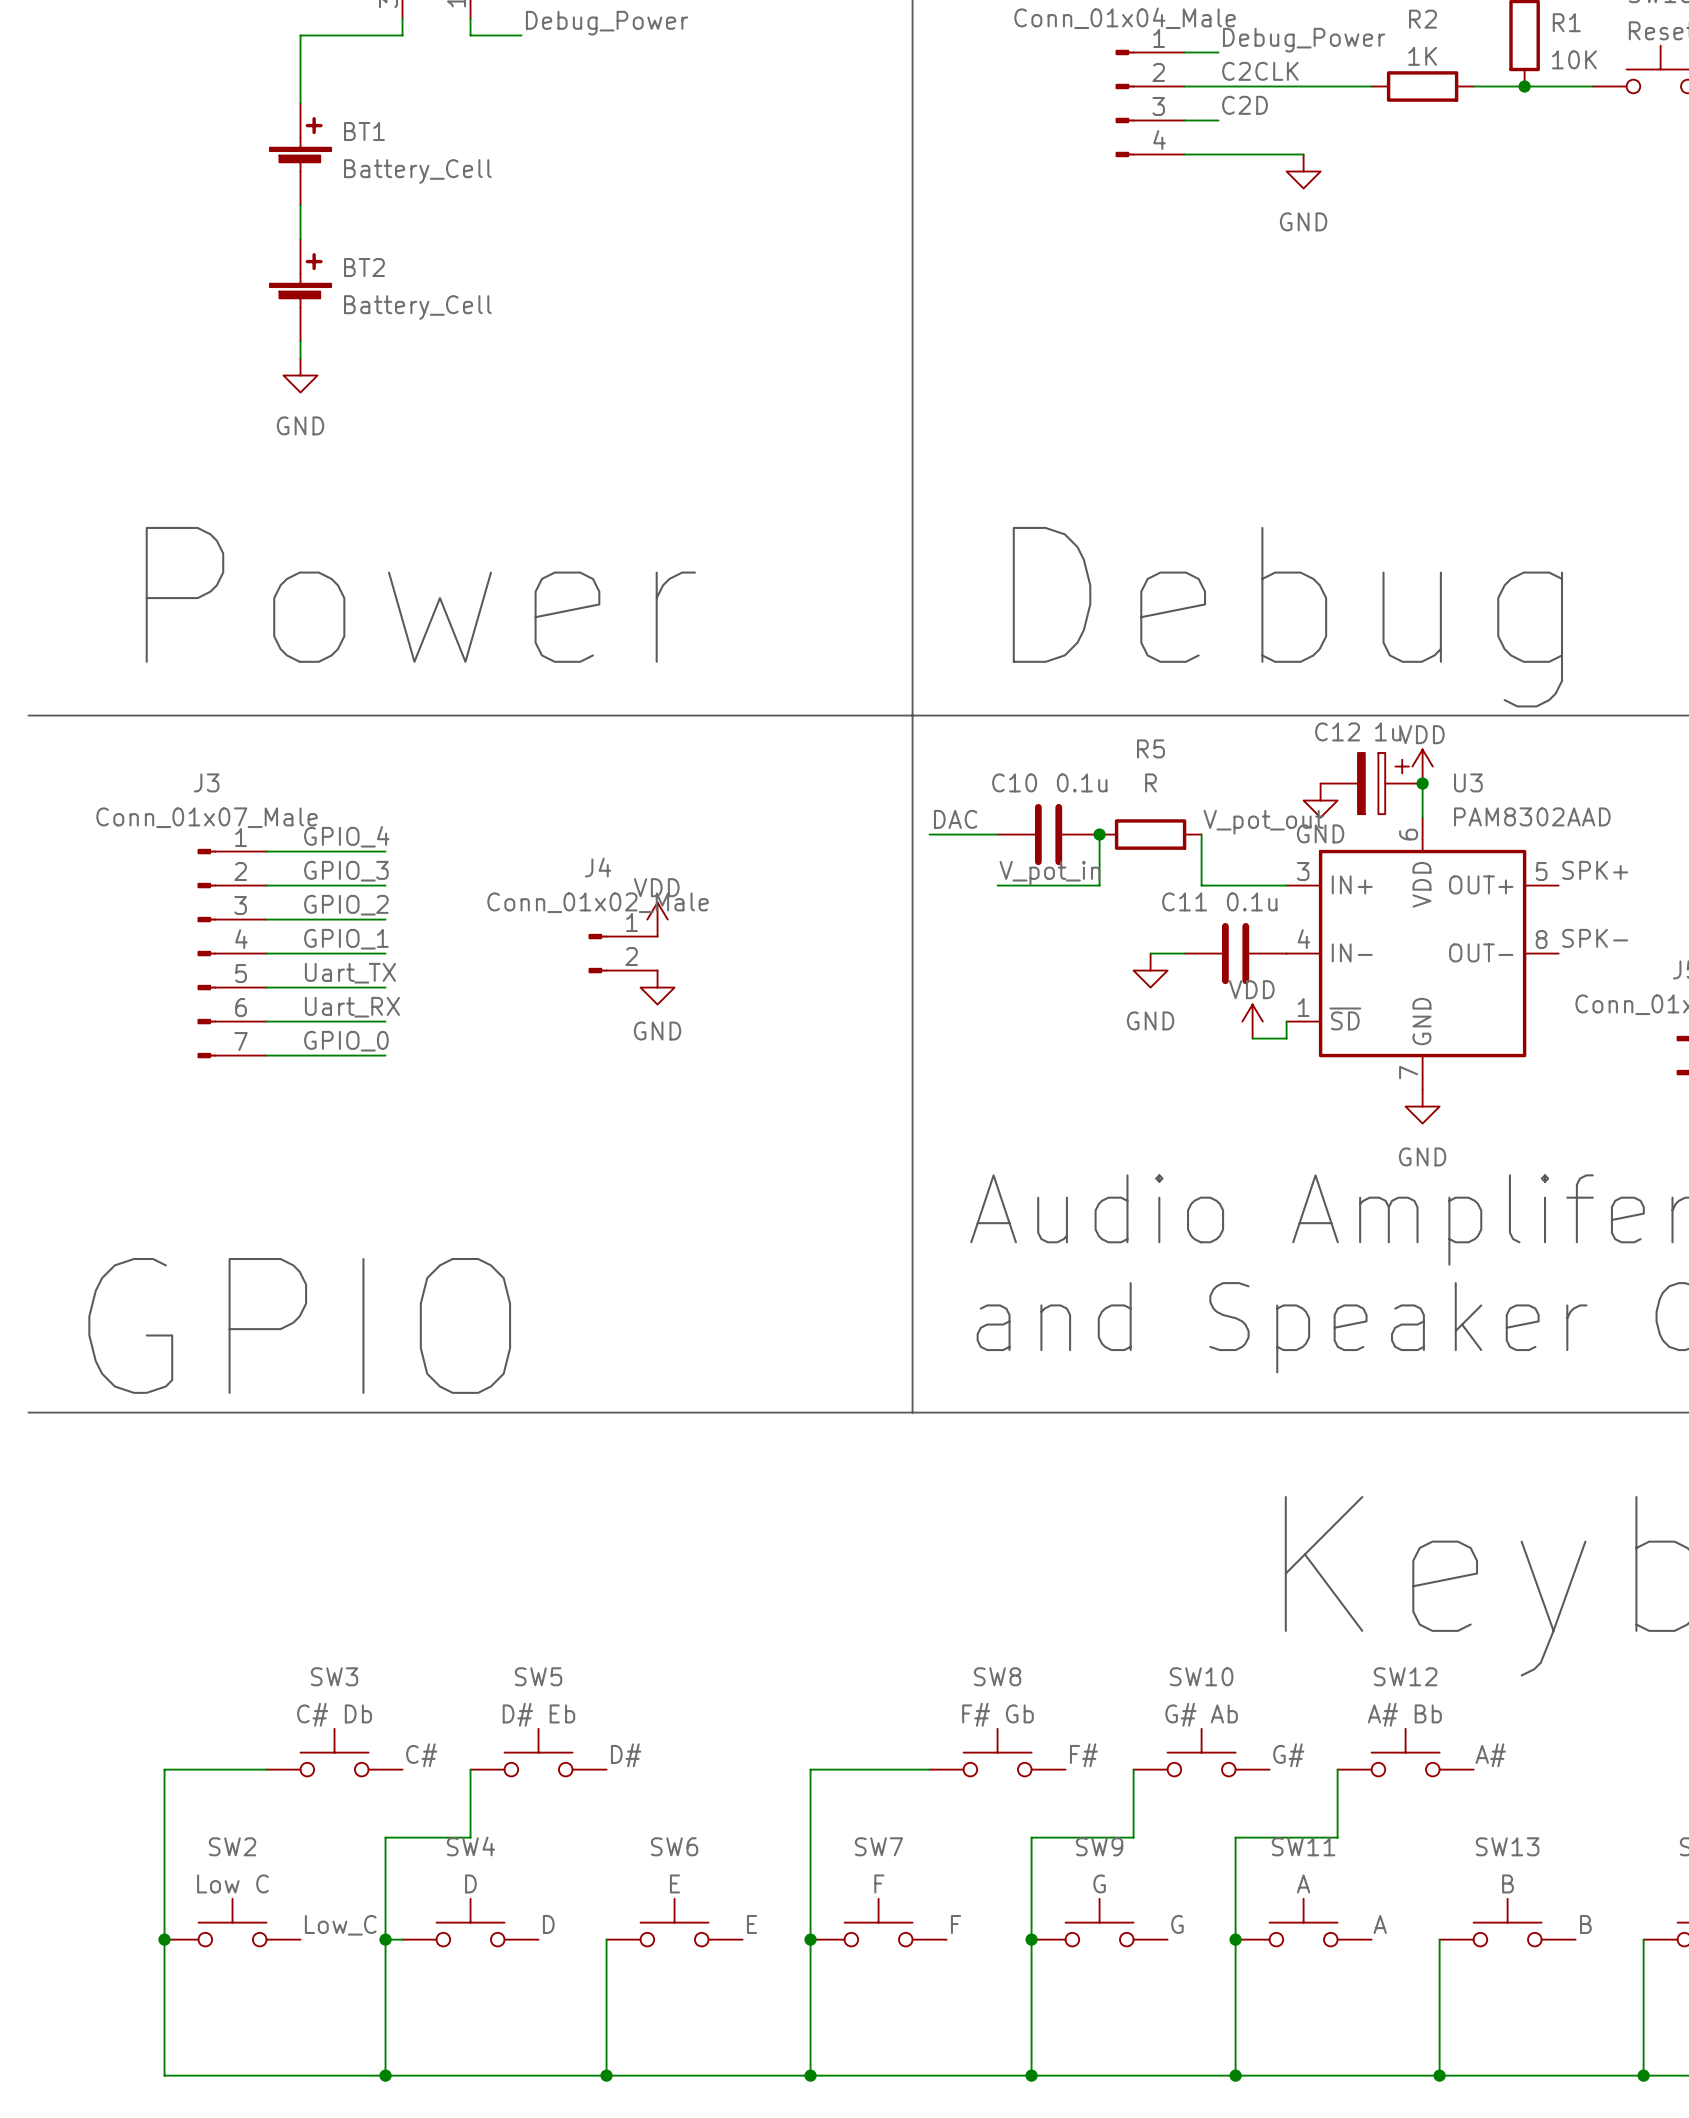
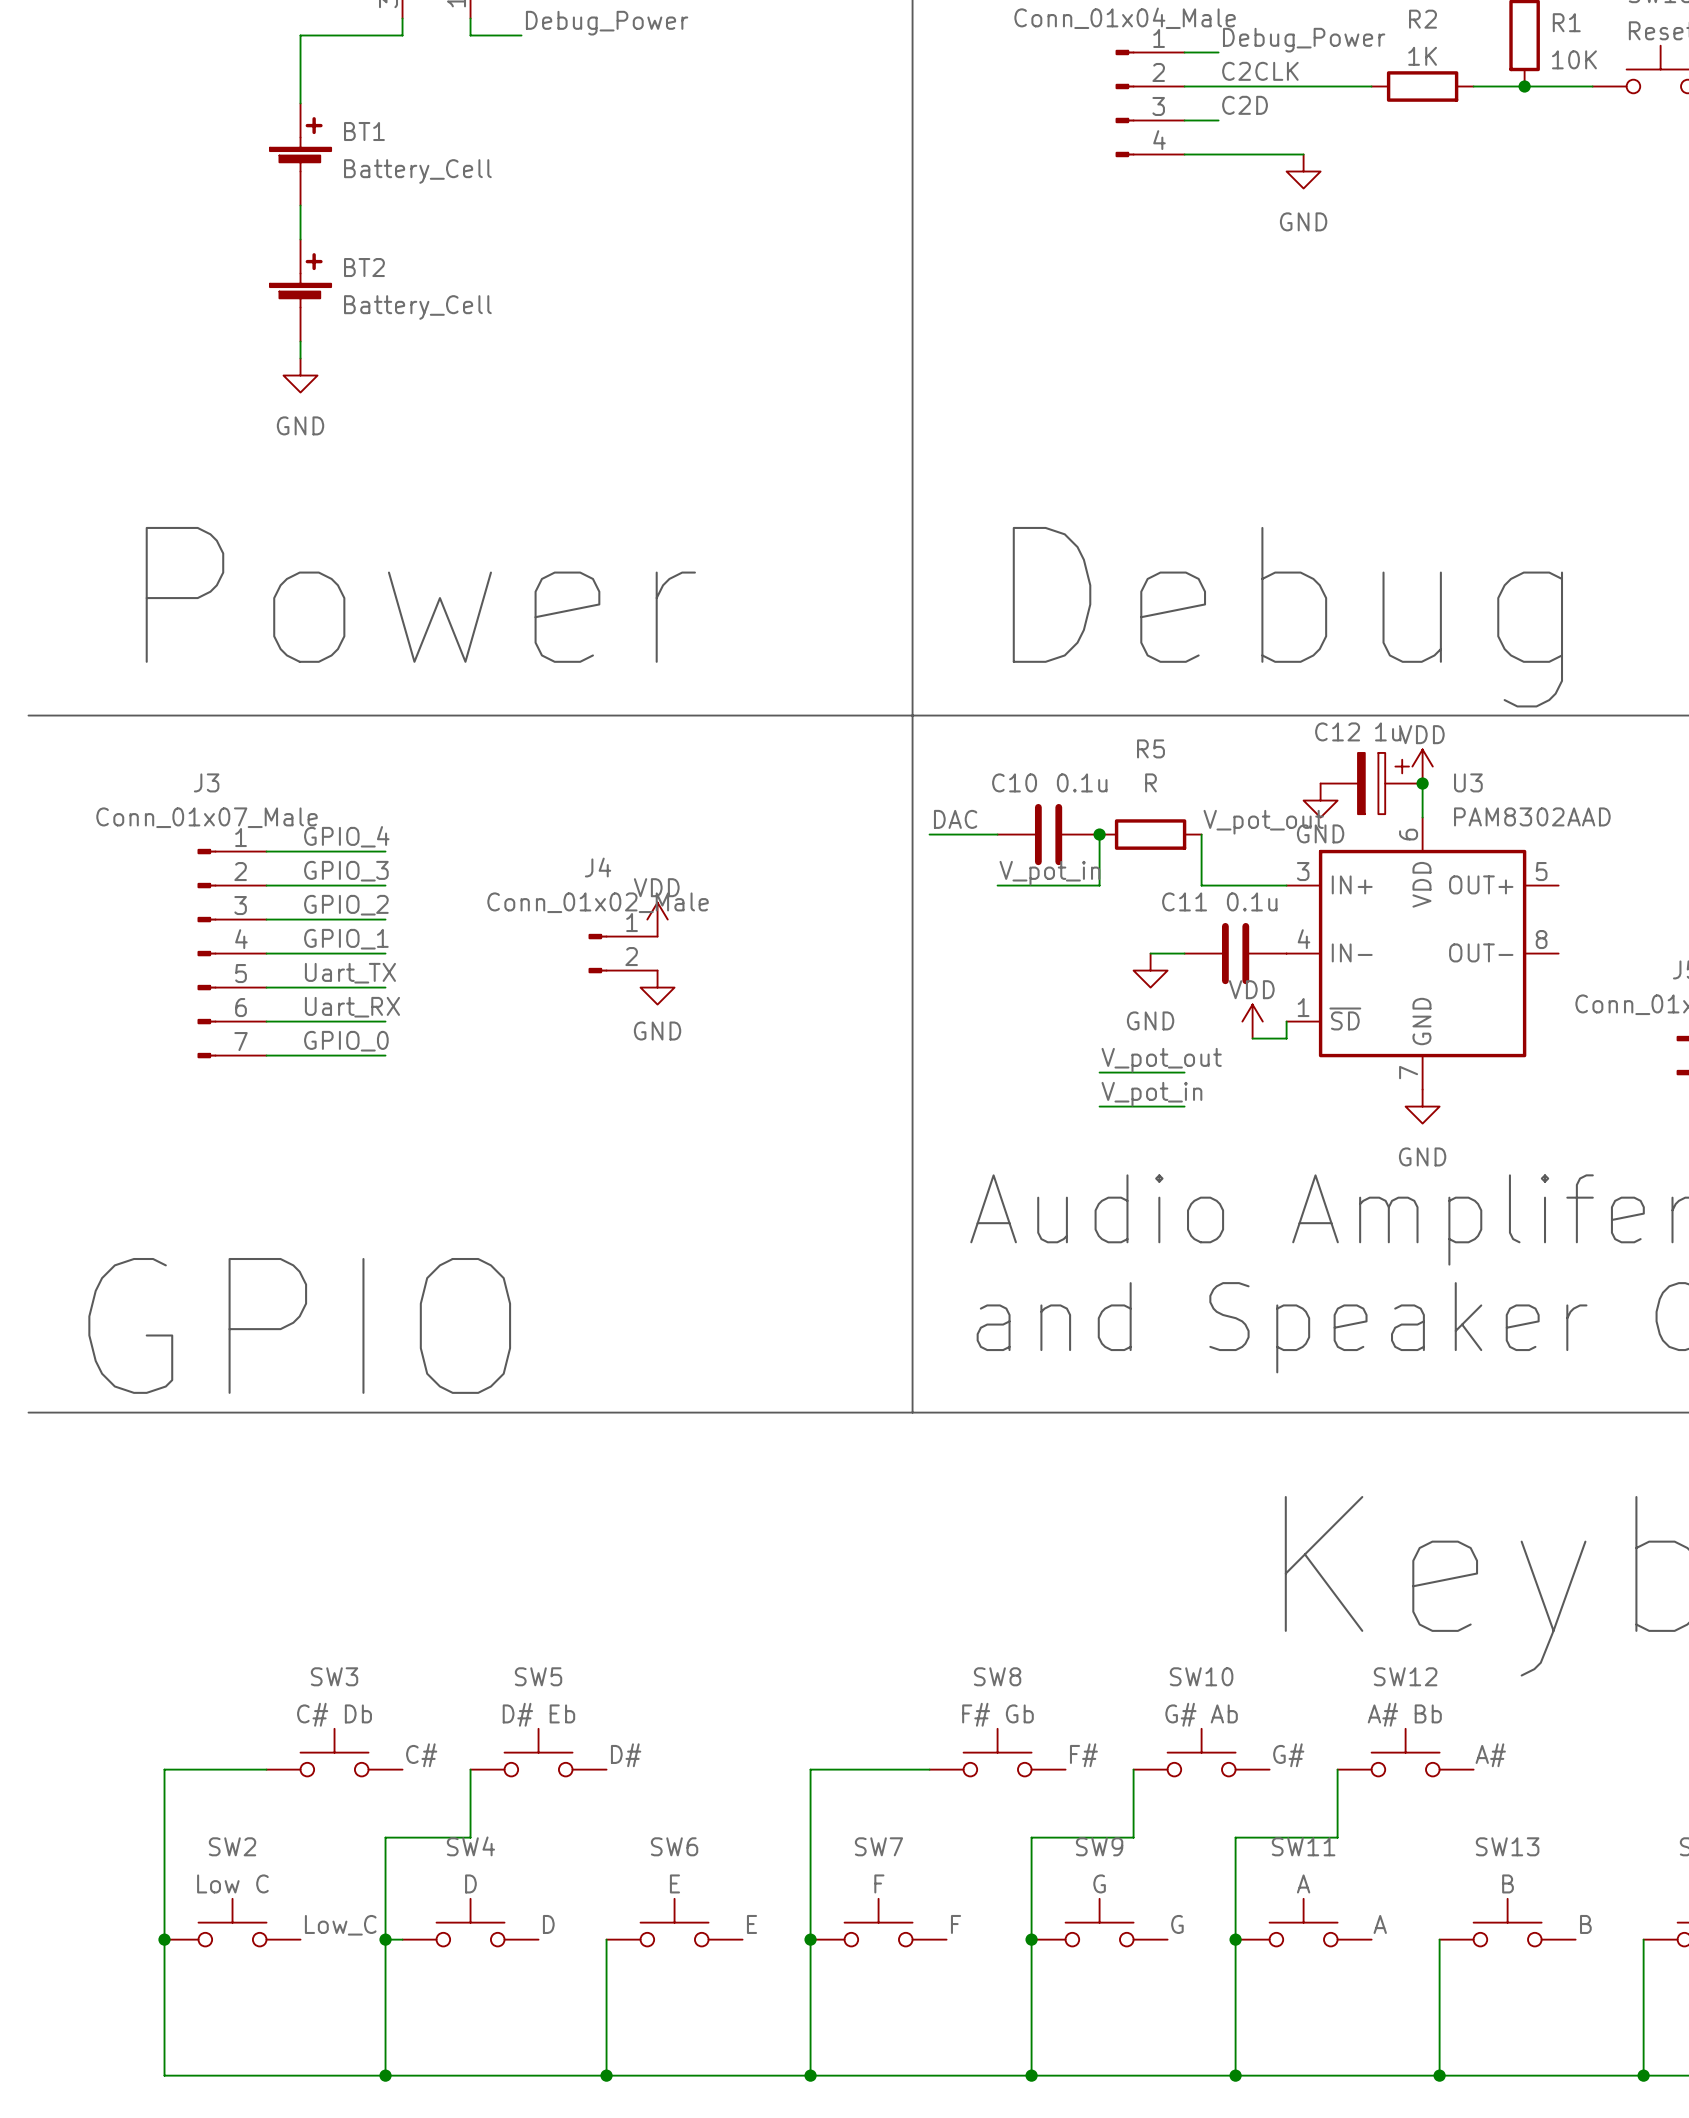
label: SPK+ (1595, 870) -> none
label: SPK- (1595, 938) -> none
label: none -> V_pot_out (1161, 1060)
wire: none -> (1099, 1072) (1184, 1072)
label: none -> V_pot_in (1151, 1094)
wire: none -> (1099, 1106) (1184, 1106)

